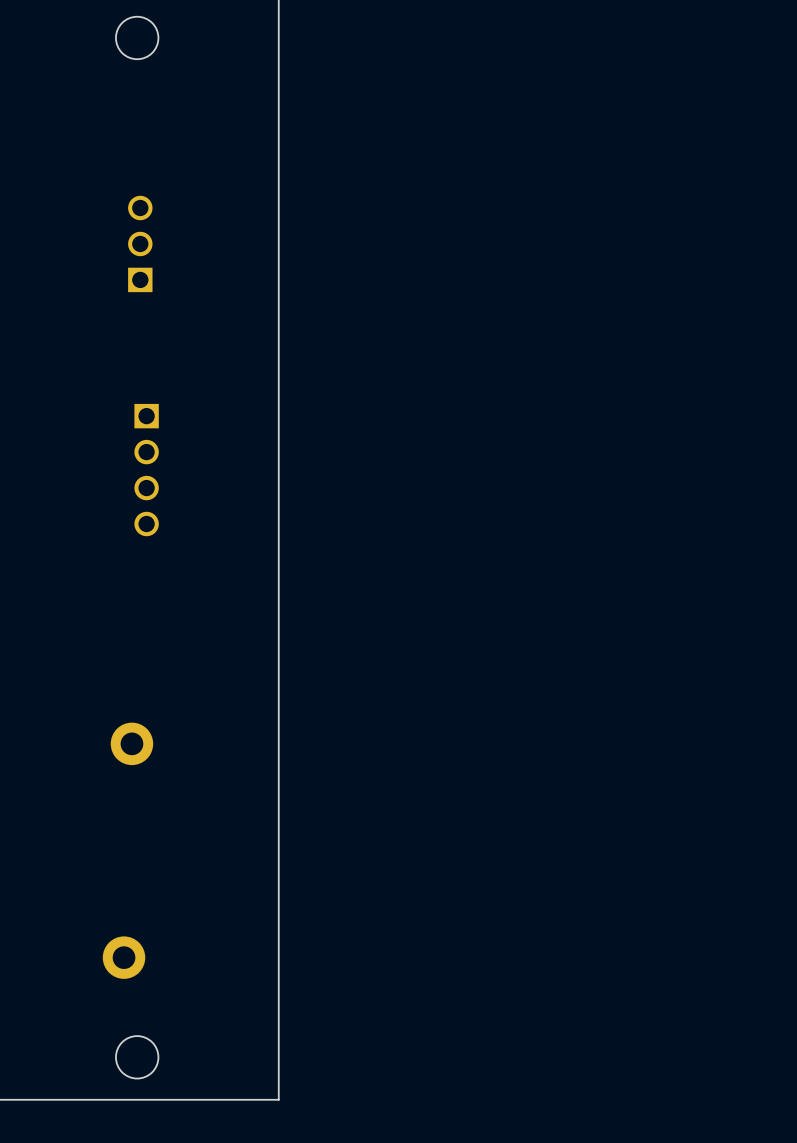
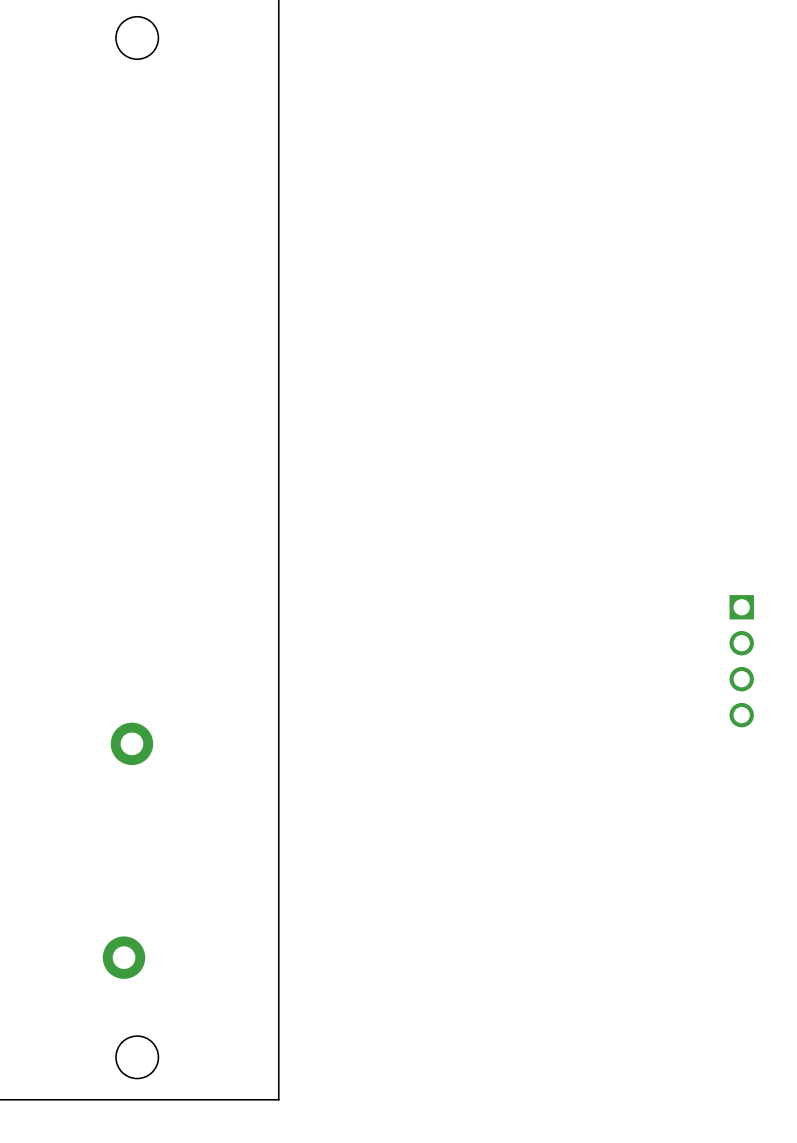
part: (140, 243) -> none
part: (146, 470) -> none
part: none -> (741, 661)

